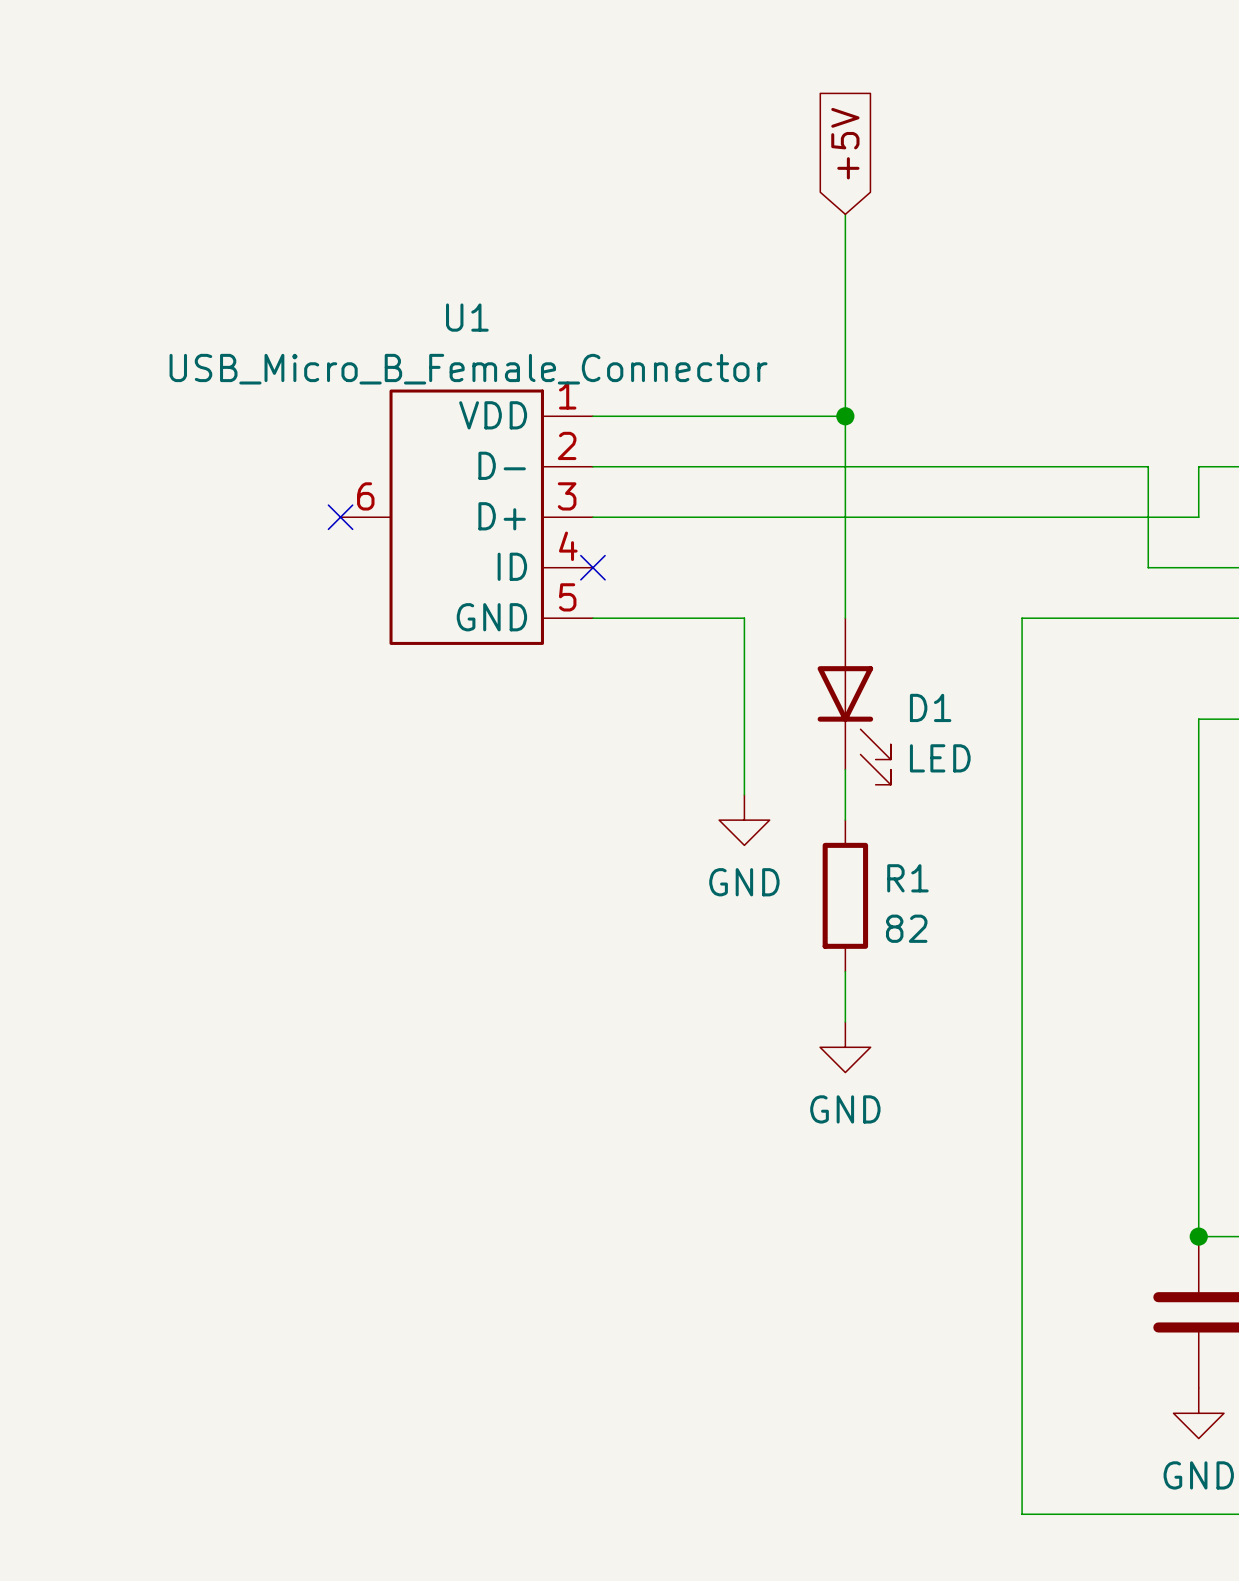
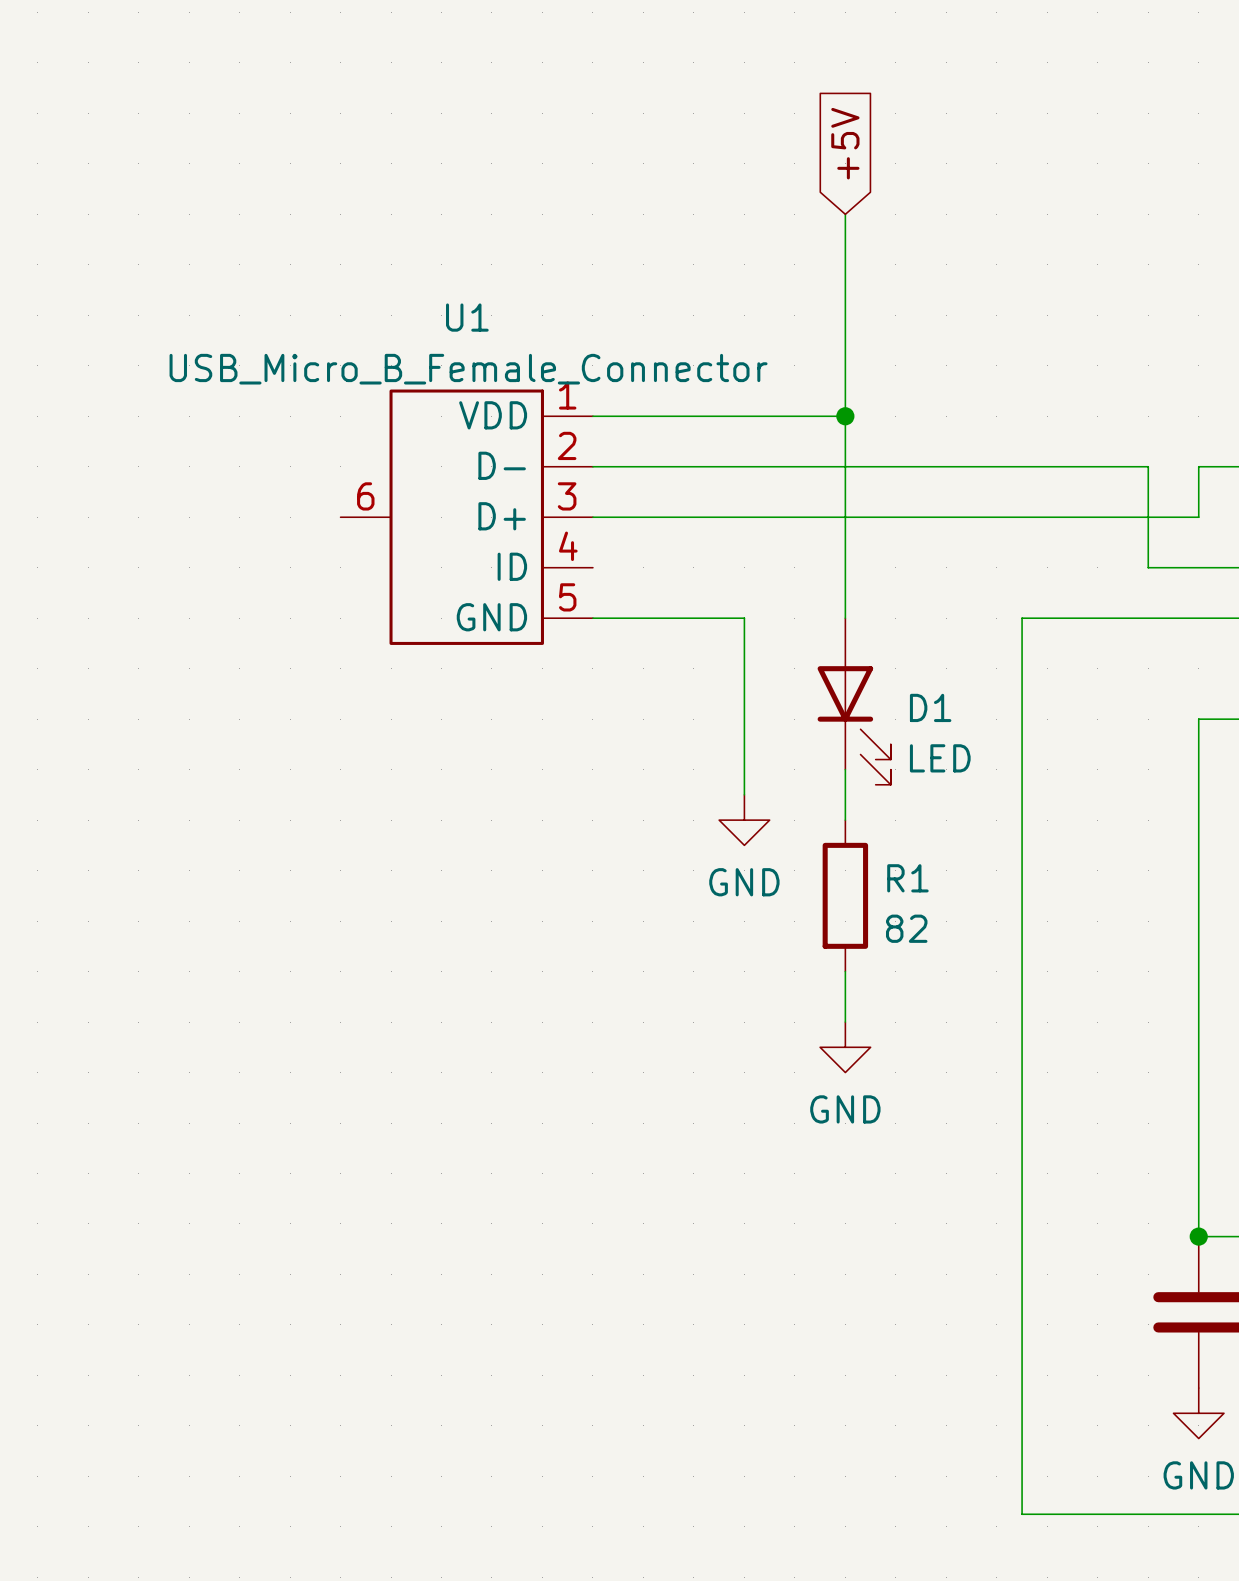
no-connect mark: (340, 517) -> none
no-connect mark: (592, 567) -> none

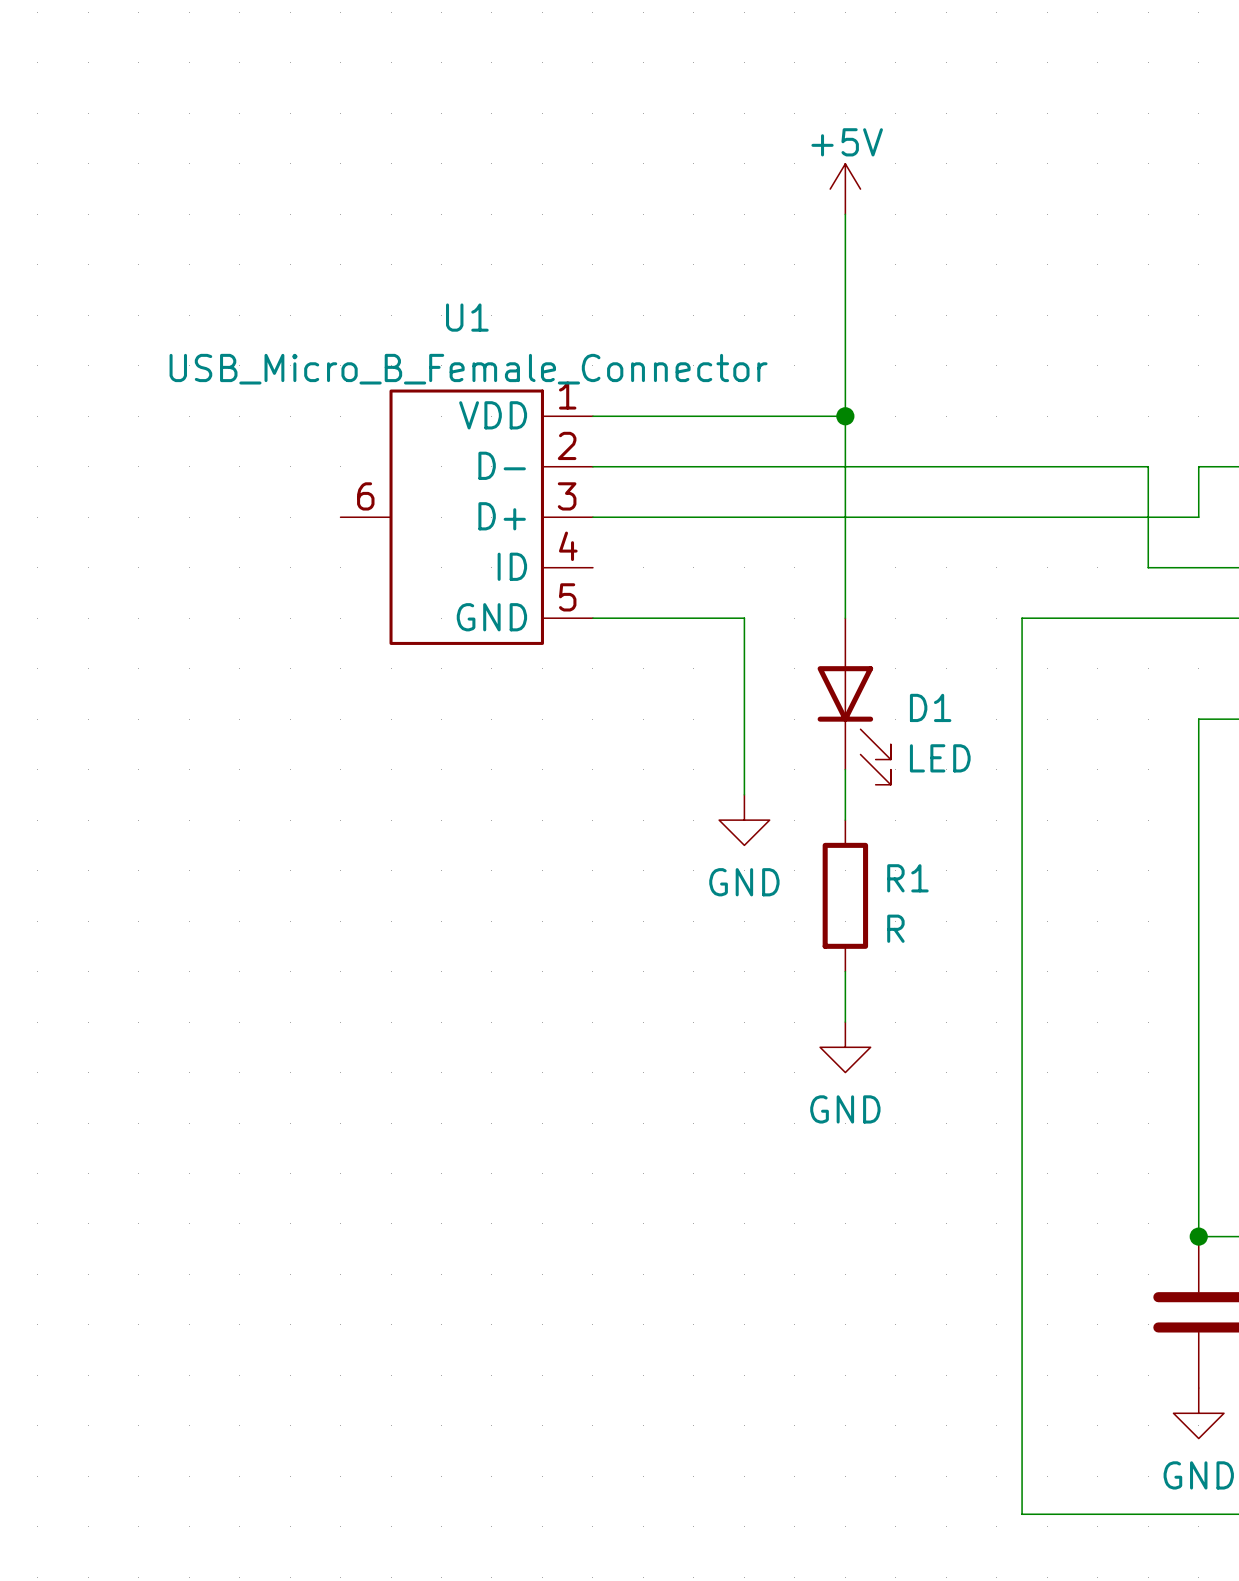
global label: +5V (845, 143) -> none
power symbol: none -> +5V (845, 189)
R1 value: 82 (906, 928) -> R (895, 928)

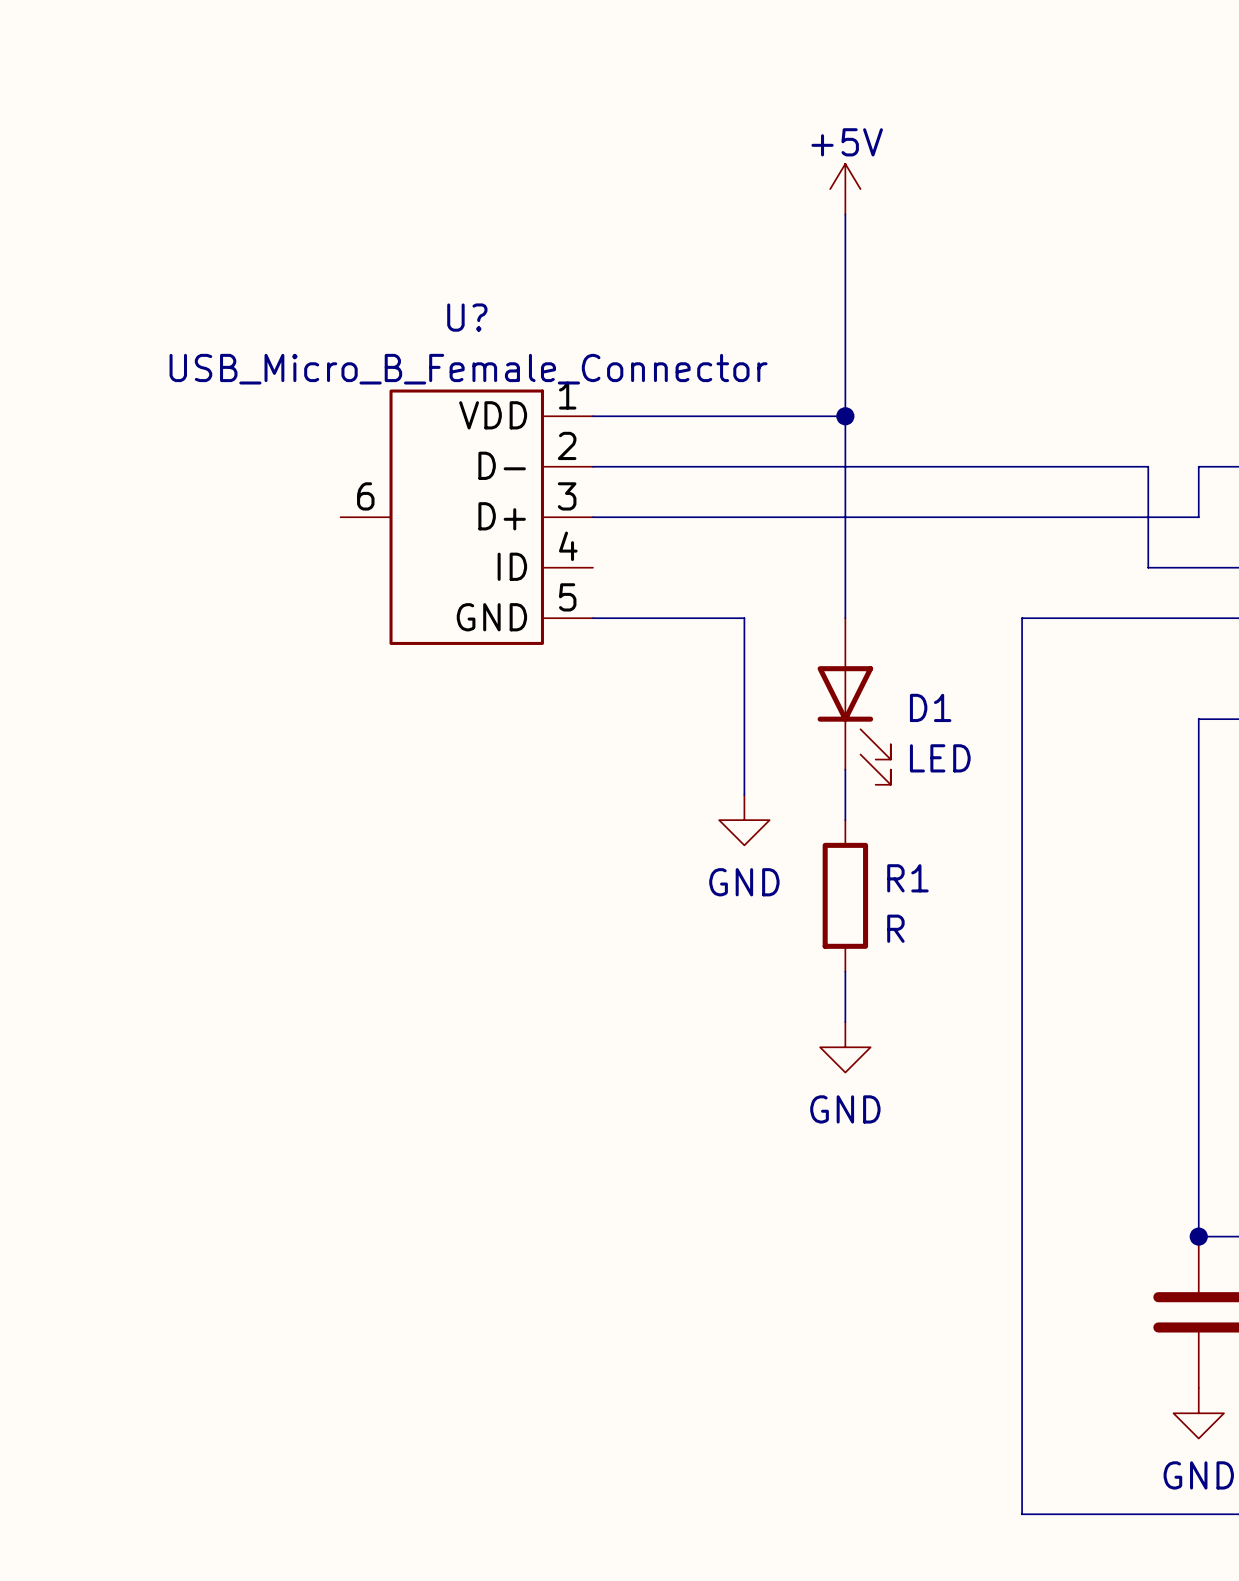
U1 name: U1 (467, 317) -> U? (467, 317)

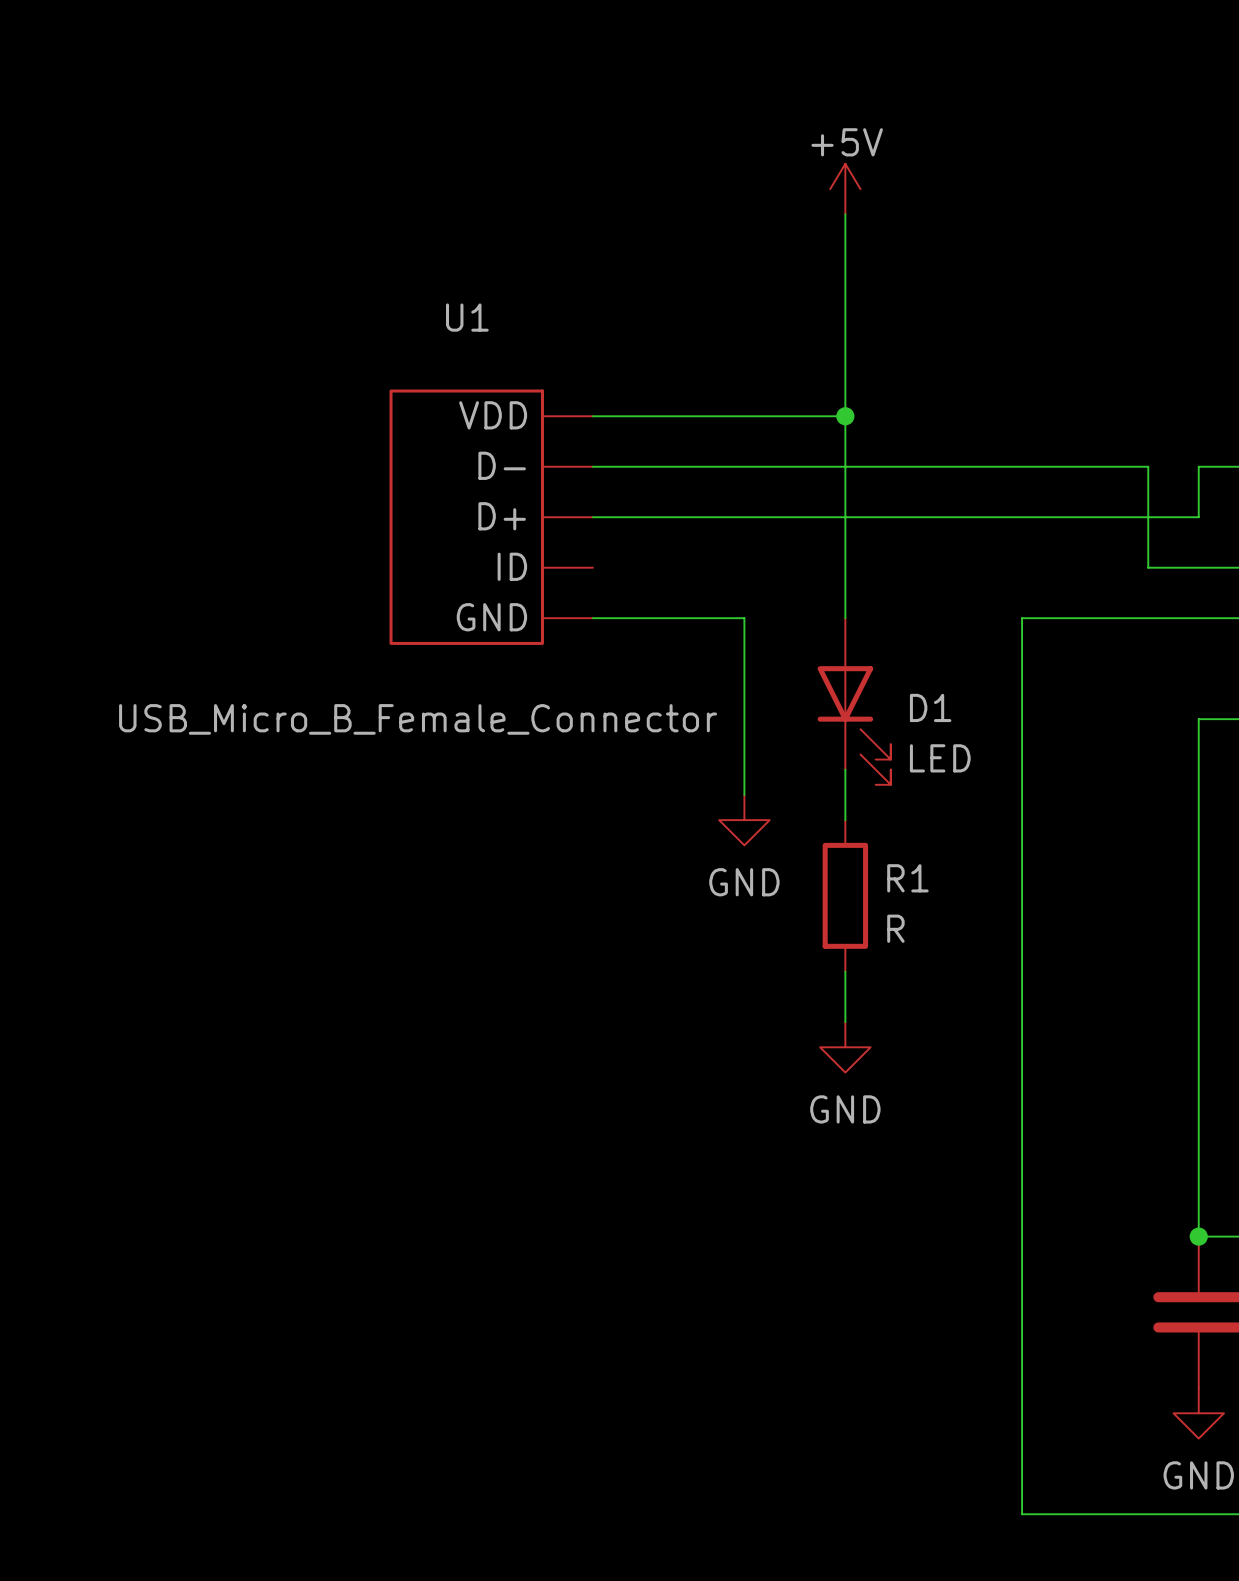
U?: USB_Micro_B_Female_Connector (466, 517) -> none
U1: none -> USB_Micro_B_Female_Connector (491, 517)

